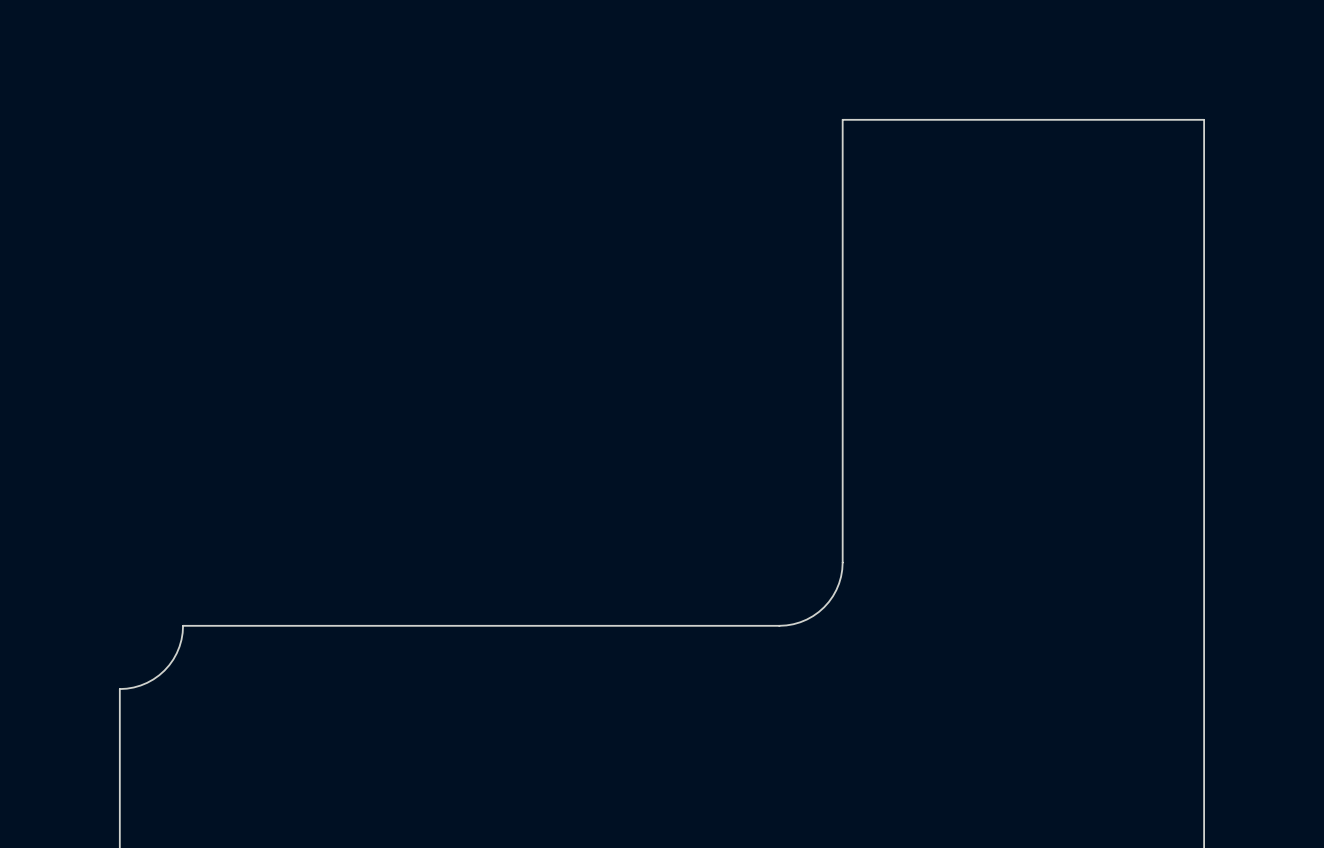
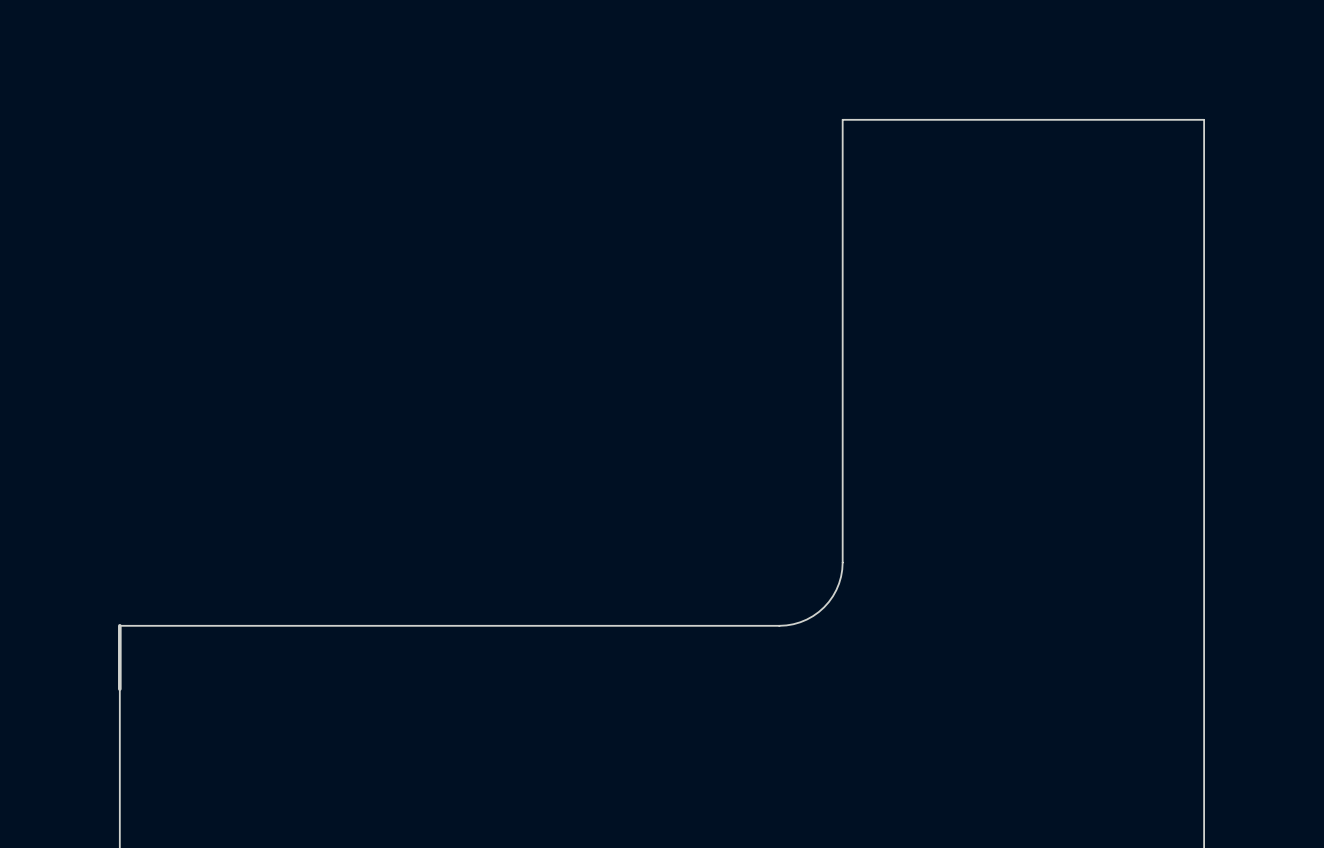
board edge: (183, 625) (179, 646) (173, 659) (164, 670) (147, 682) (133, 687) (119, 689) -> (183, 625) (119, 625) (119, 689)

